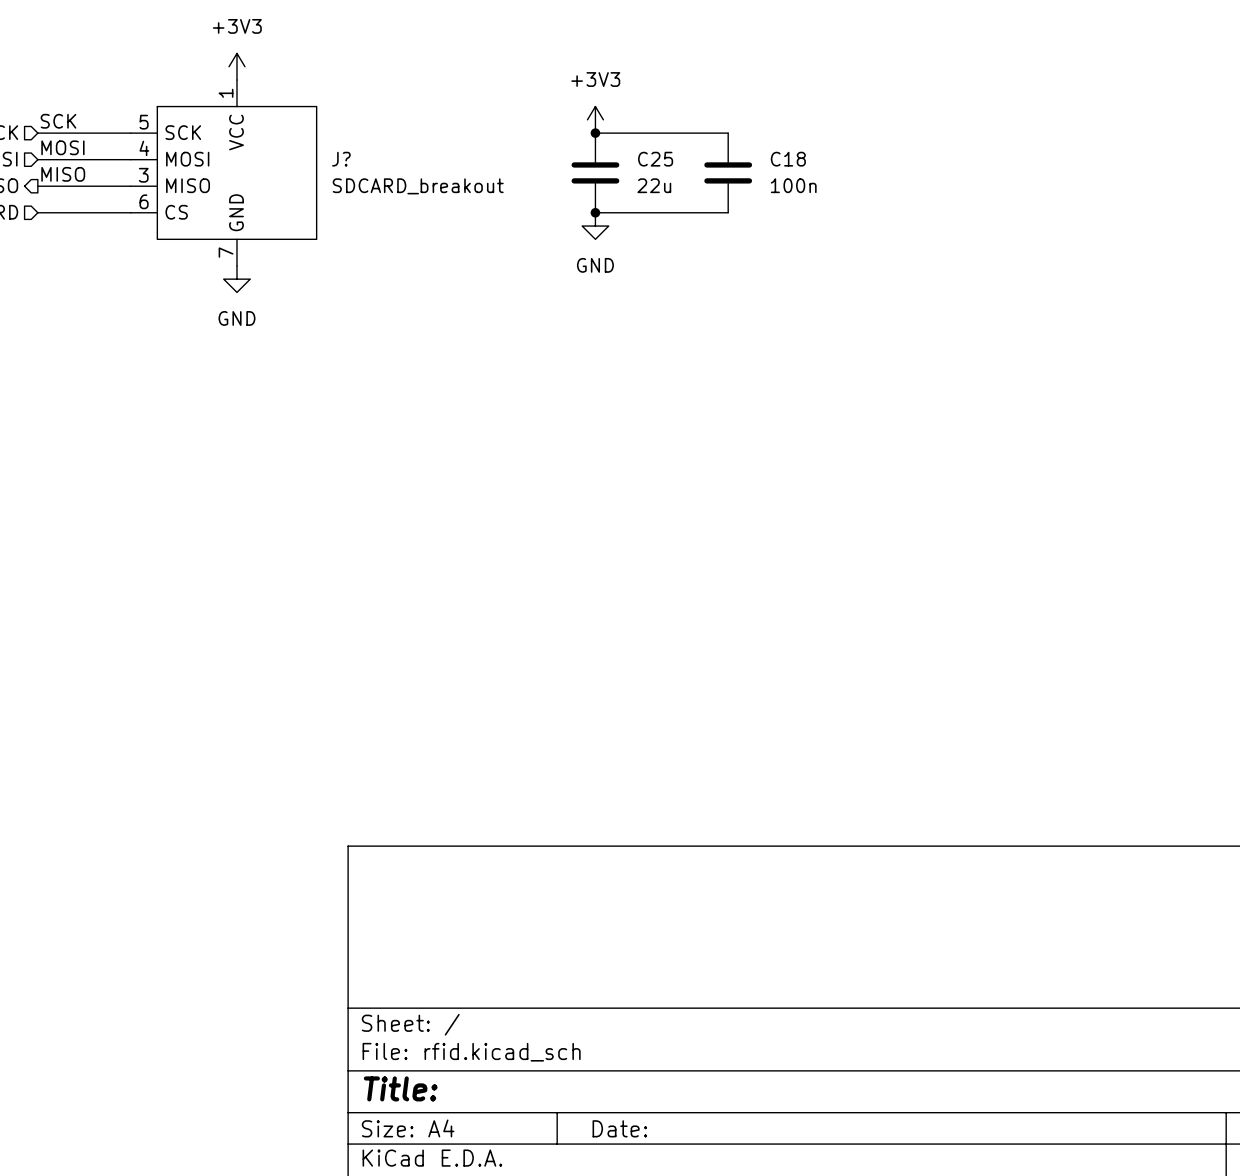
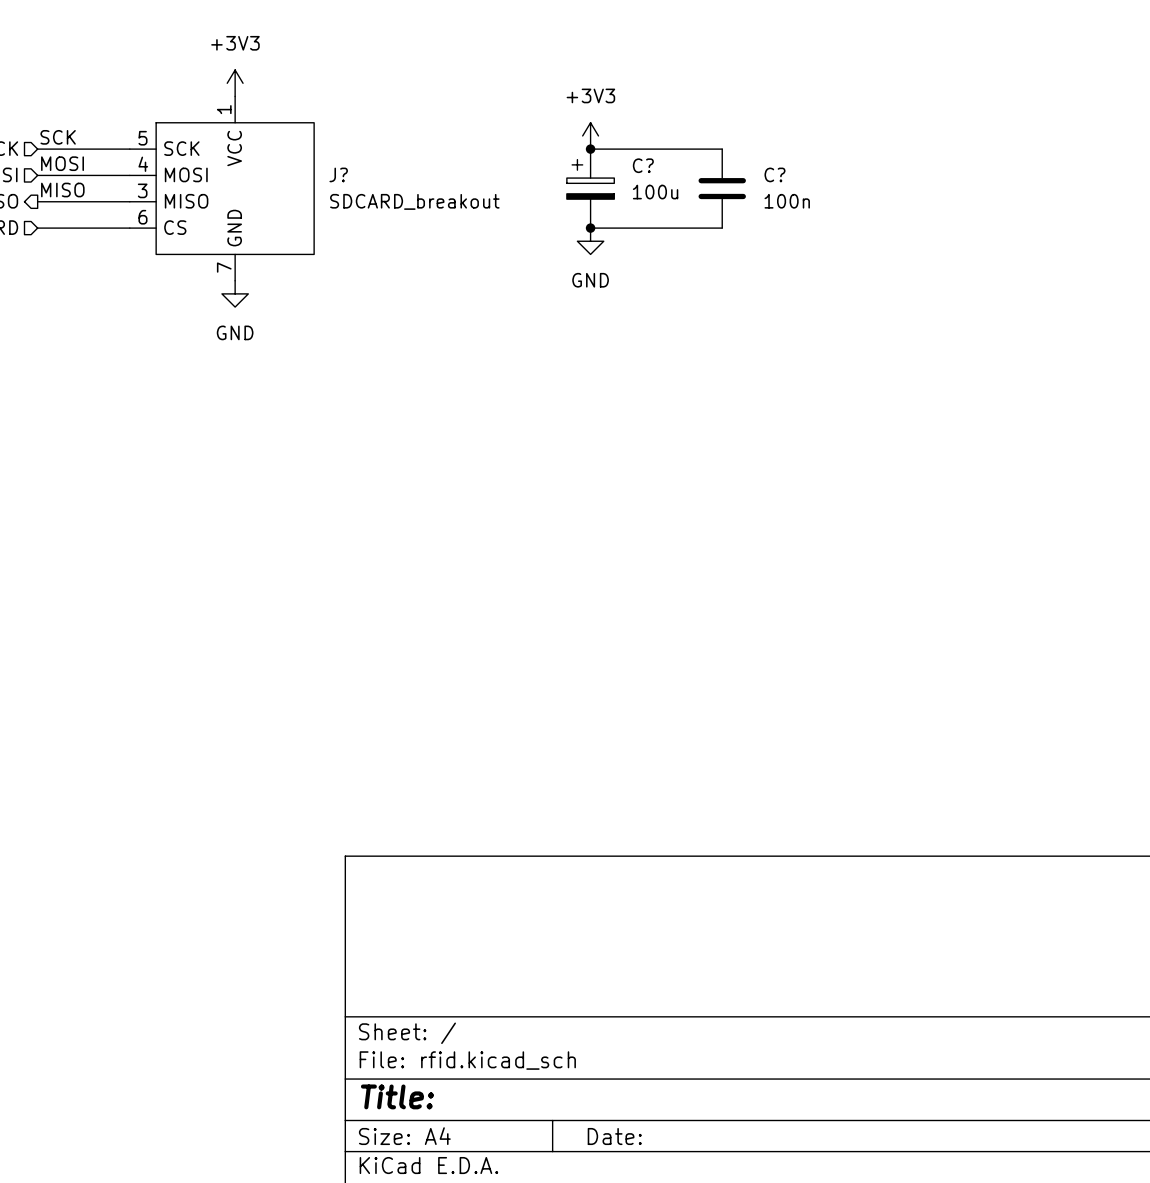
C18 name: C18 (788, 159) -> C? (774, 174)
C25: 22u (595, 172) -> none
C?: none -> 100u (590, 188)

